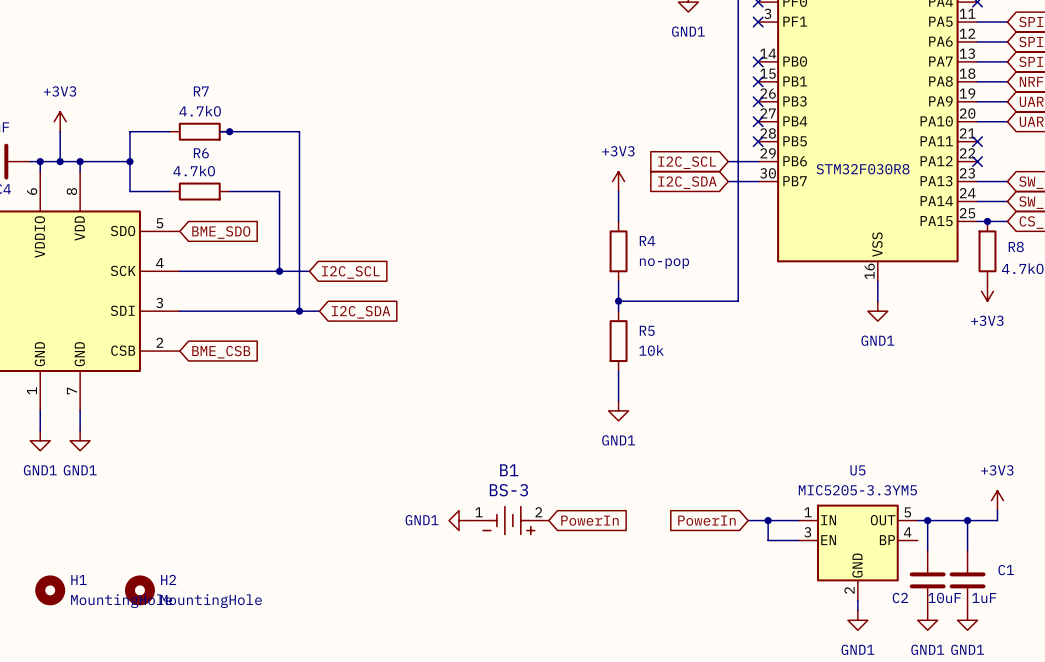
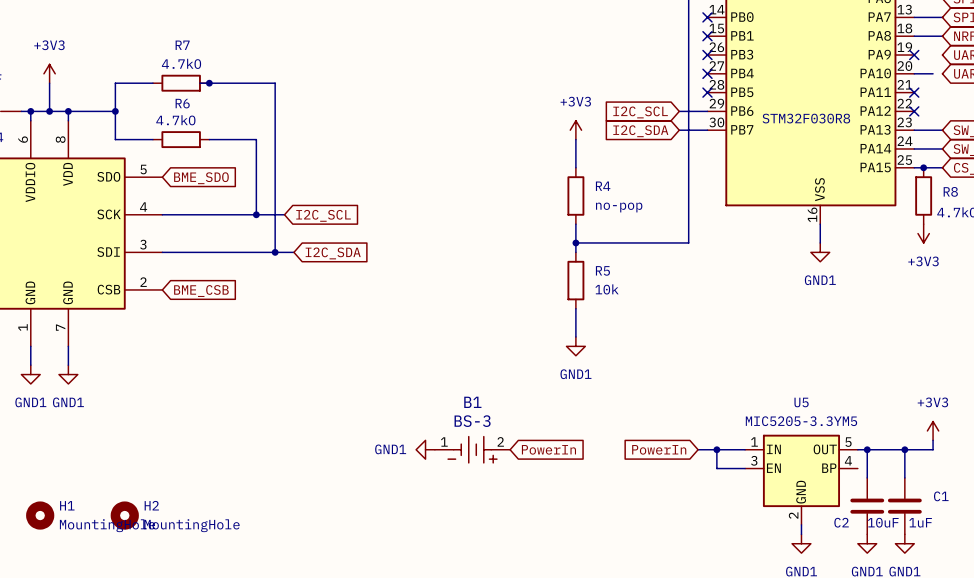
wire: (977, 101) (1007, 101) -> none
no-connect mark: none -> (914, 55)
wire: (997, 121) (1007, 121) -> none

